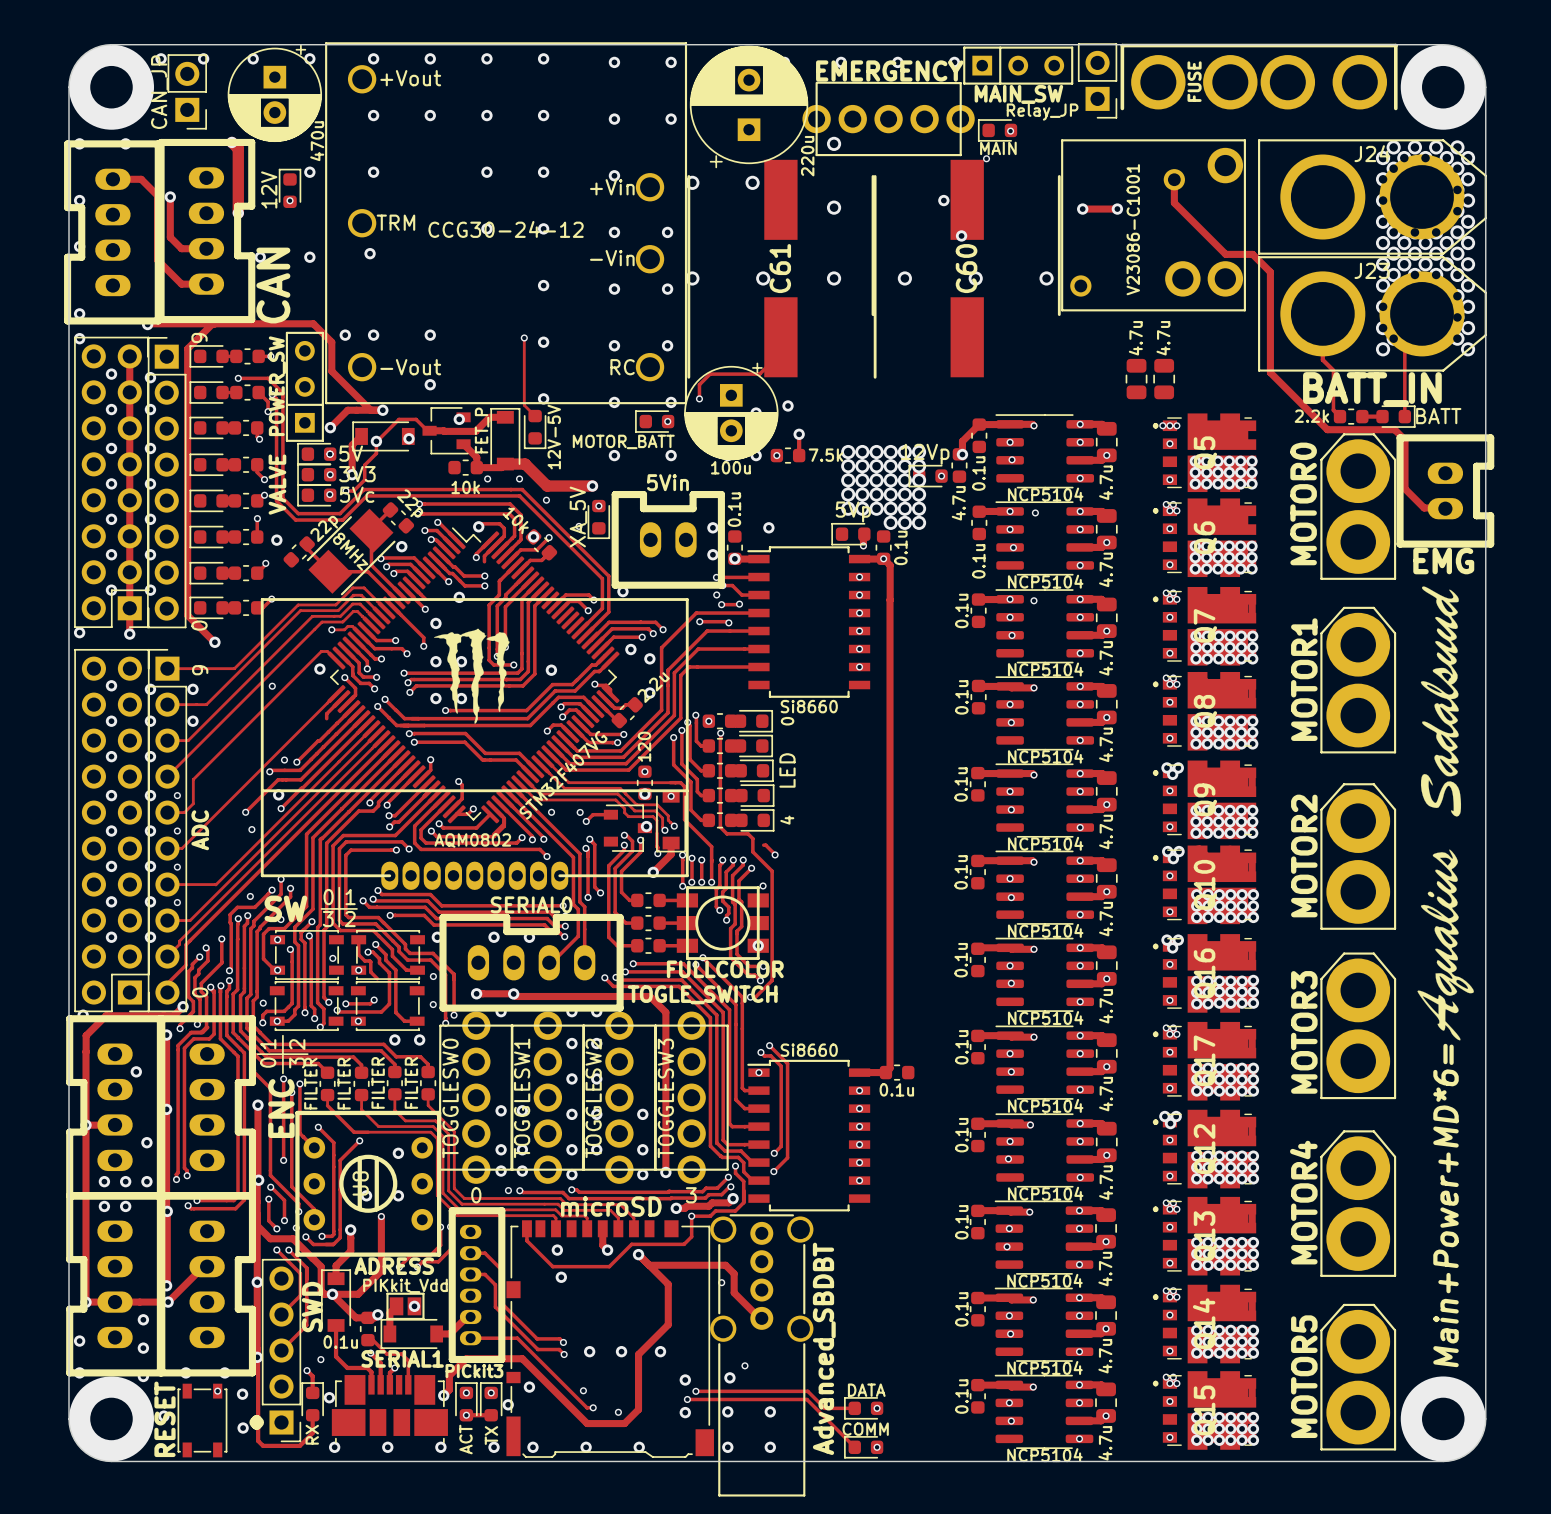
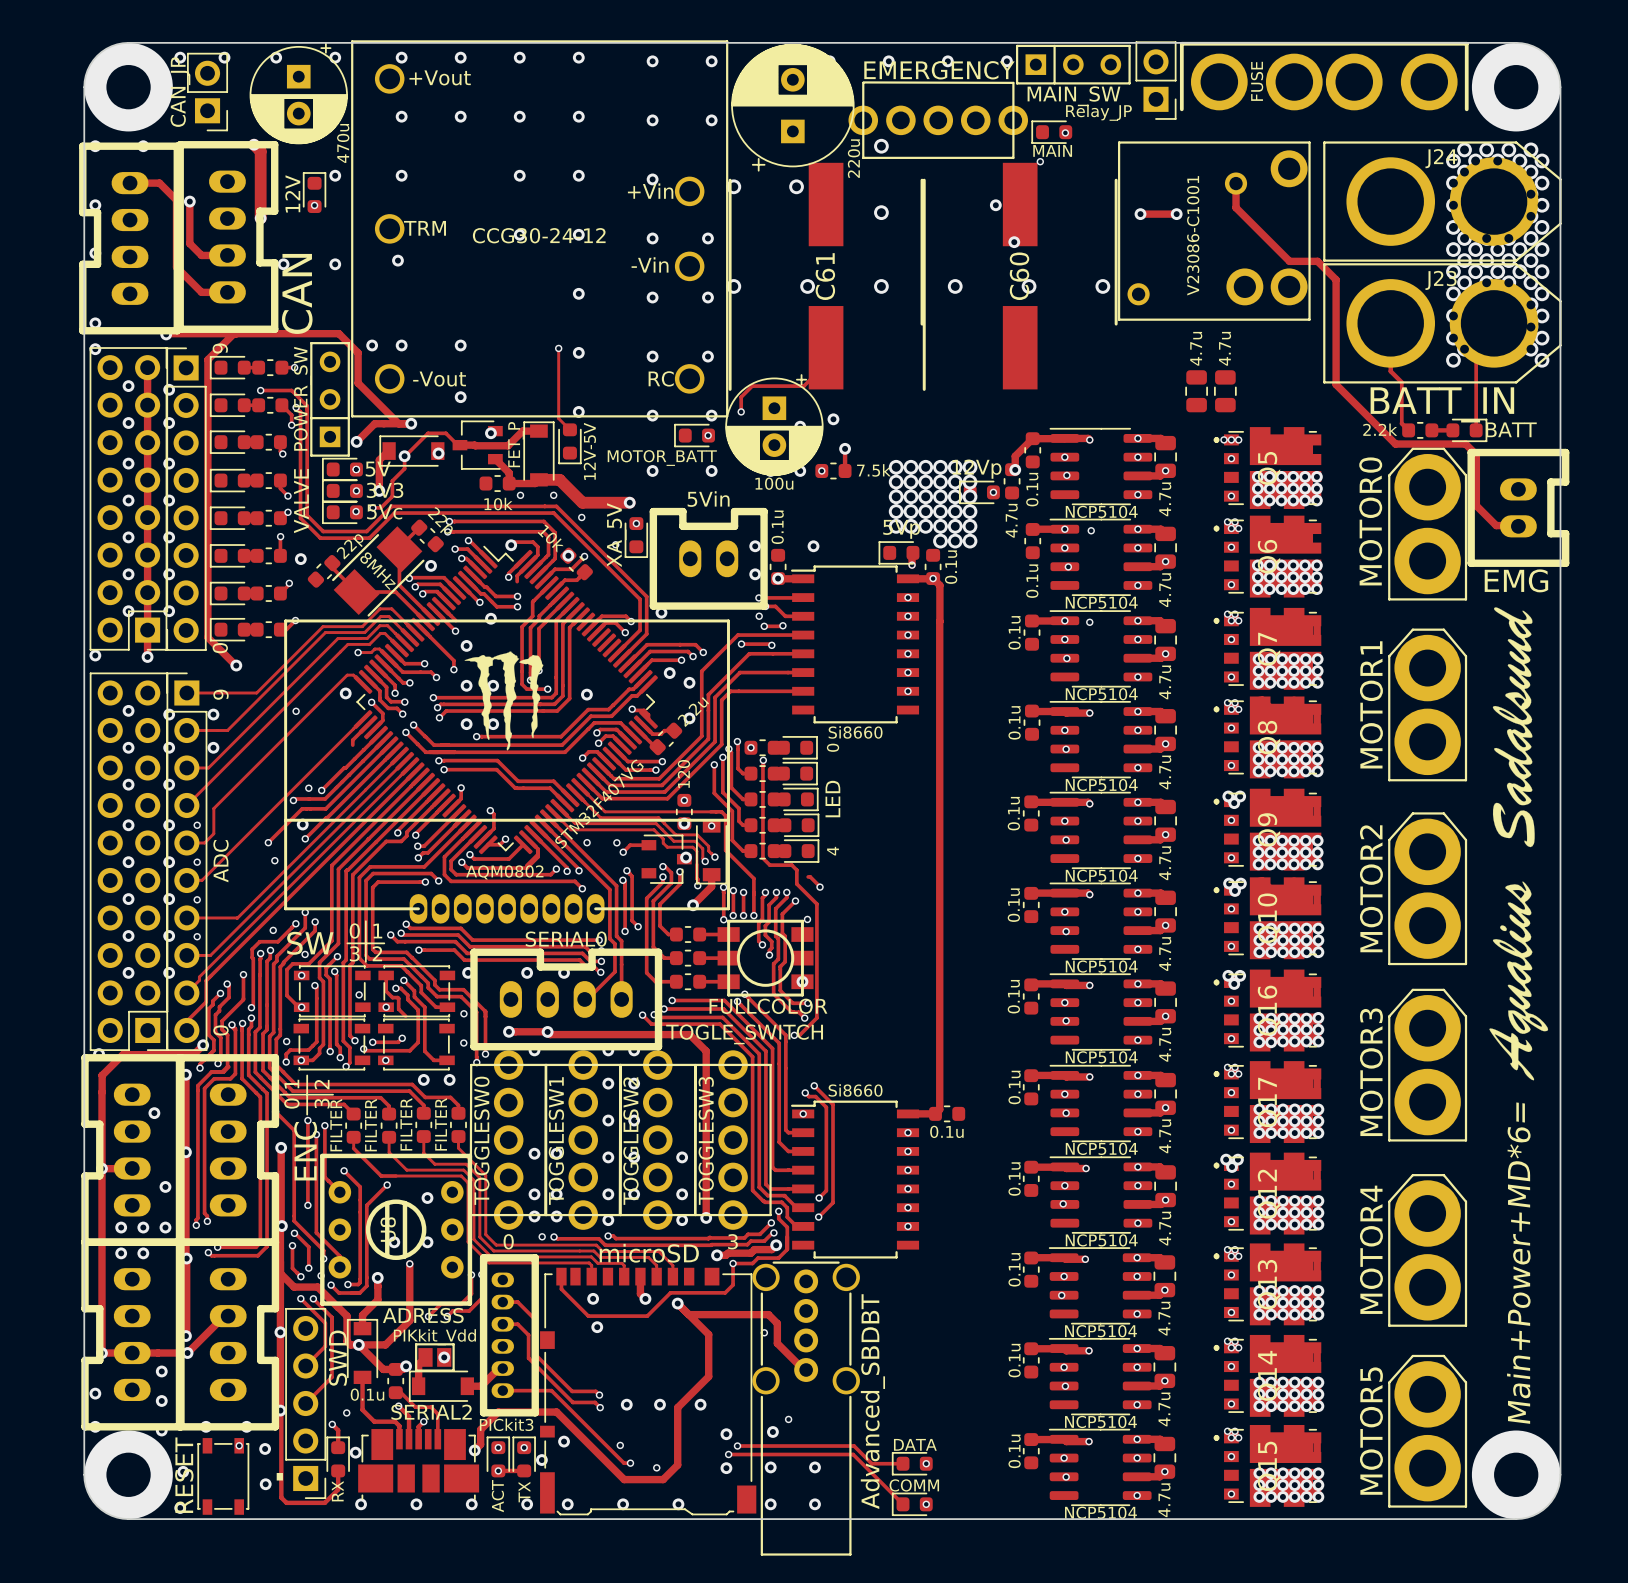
part value: SERIAL1 (402, 1358) -> SERIAL2 (431, 1412)

